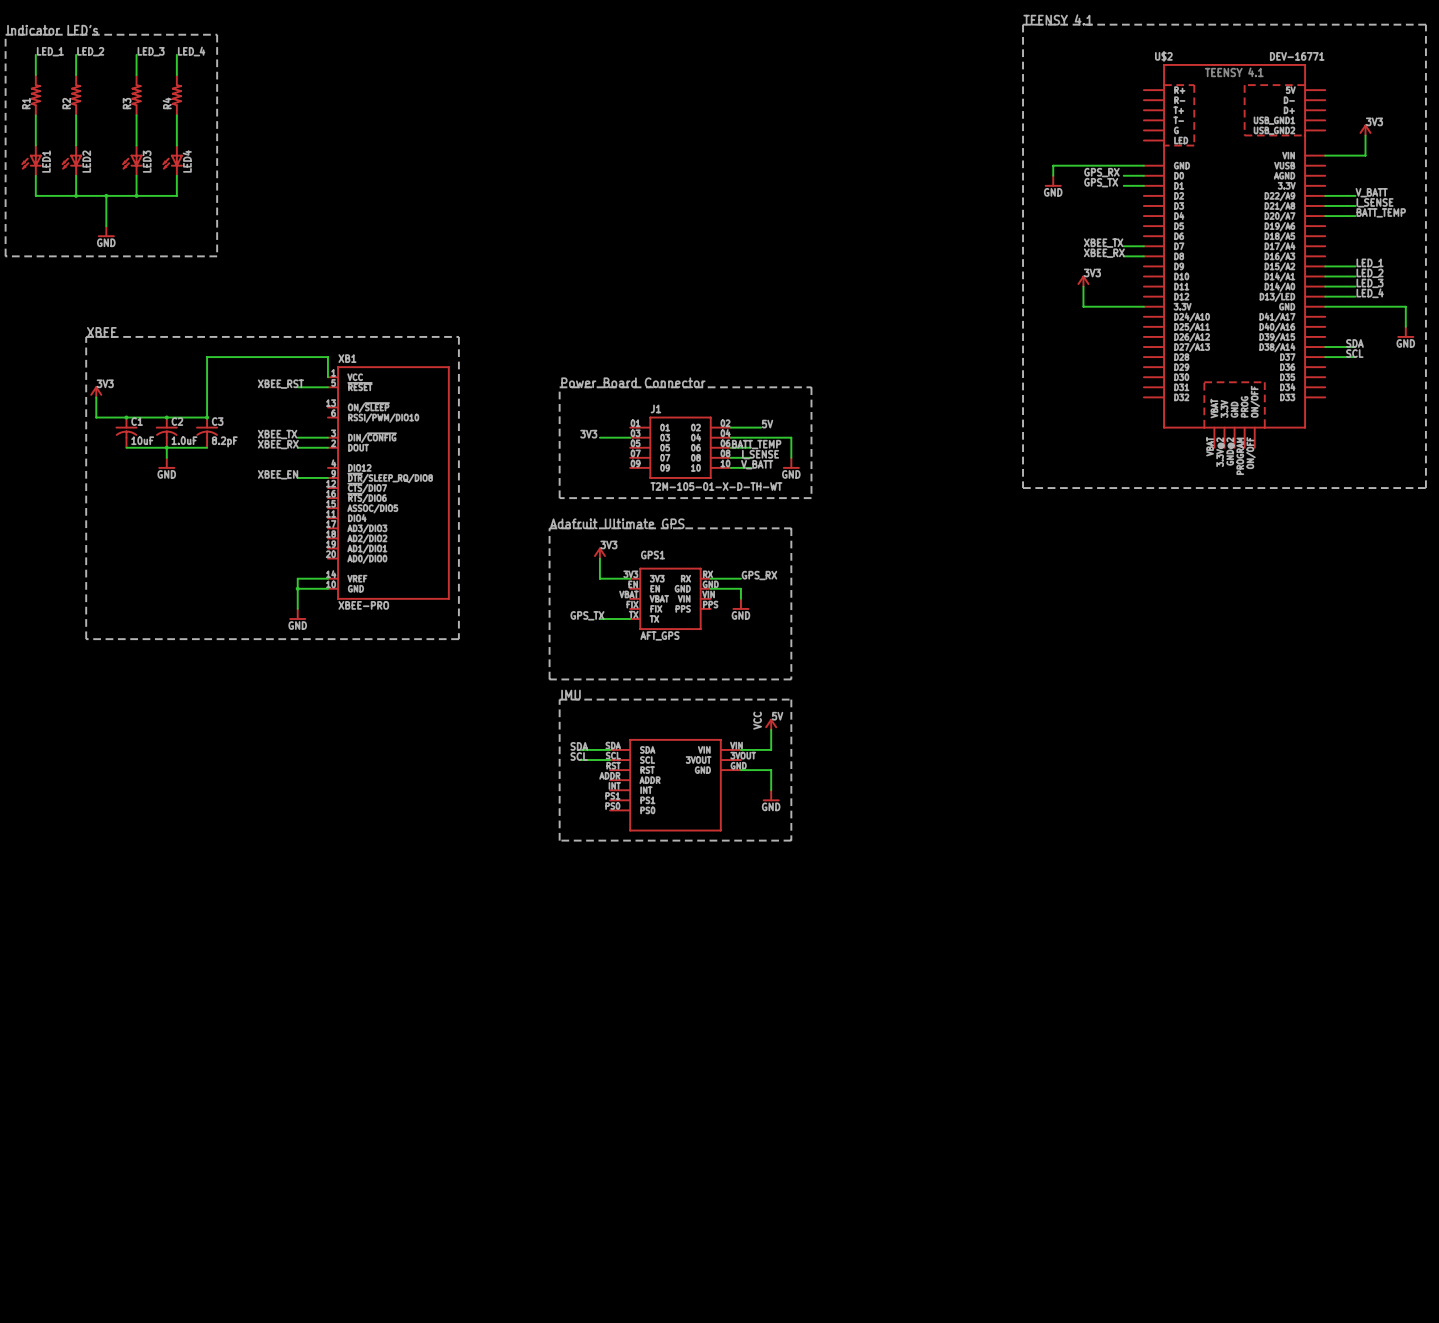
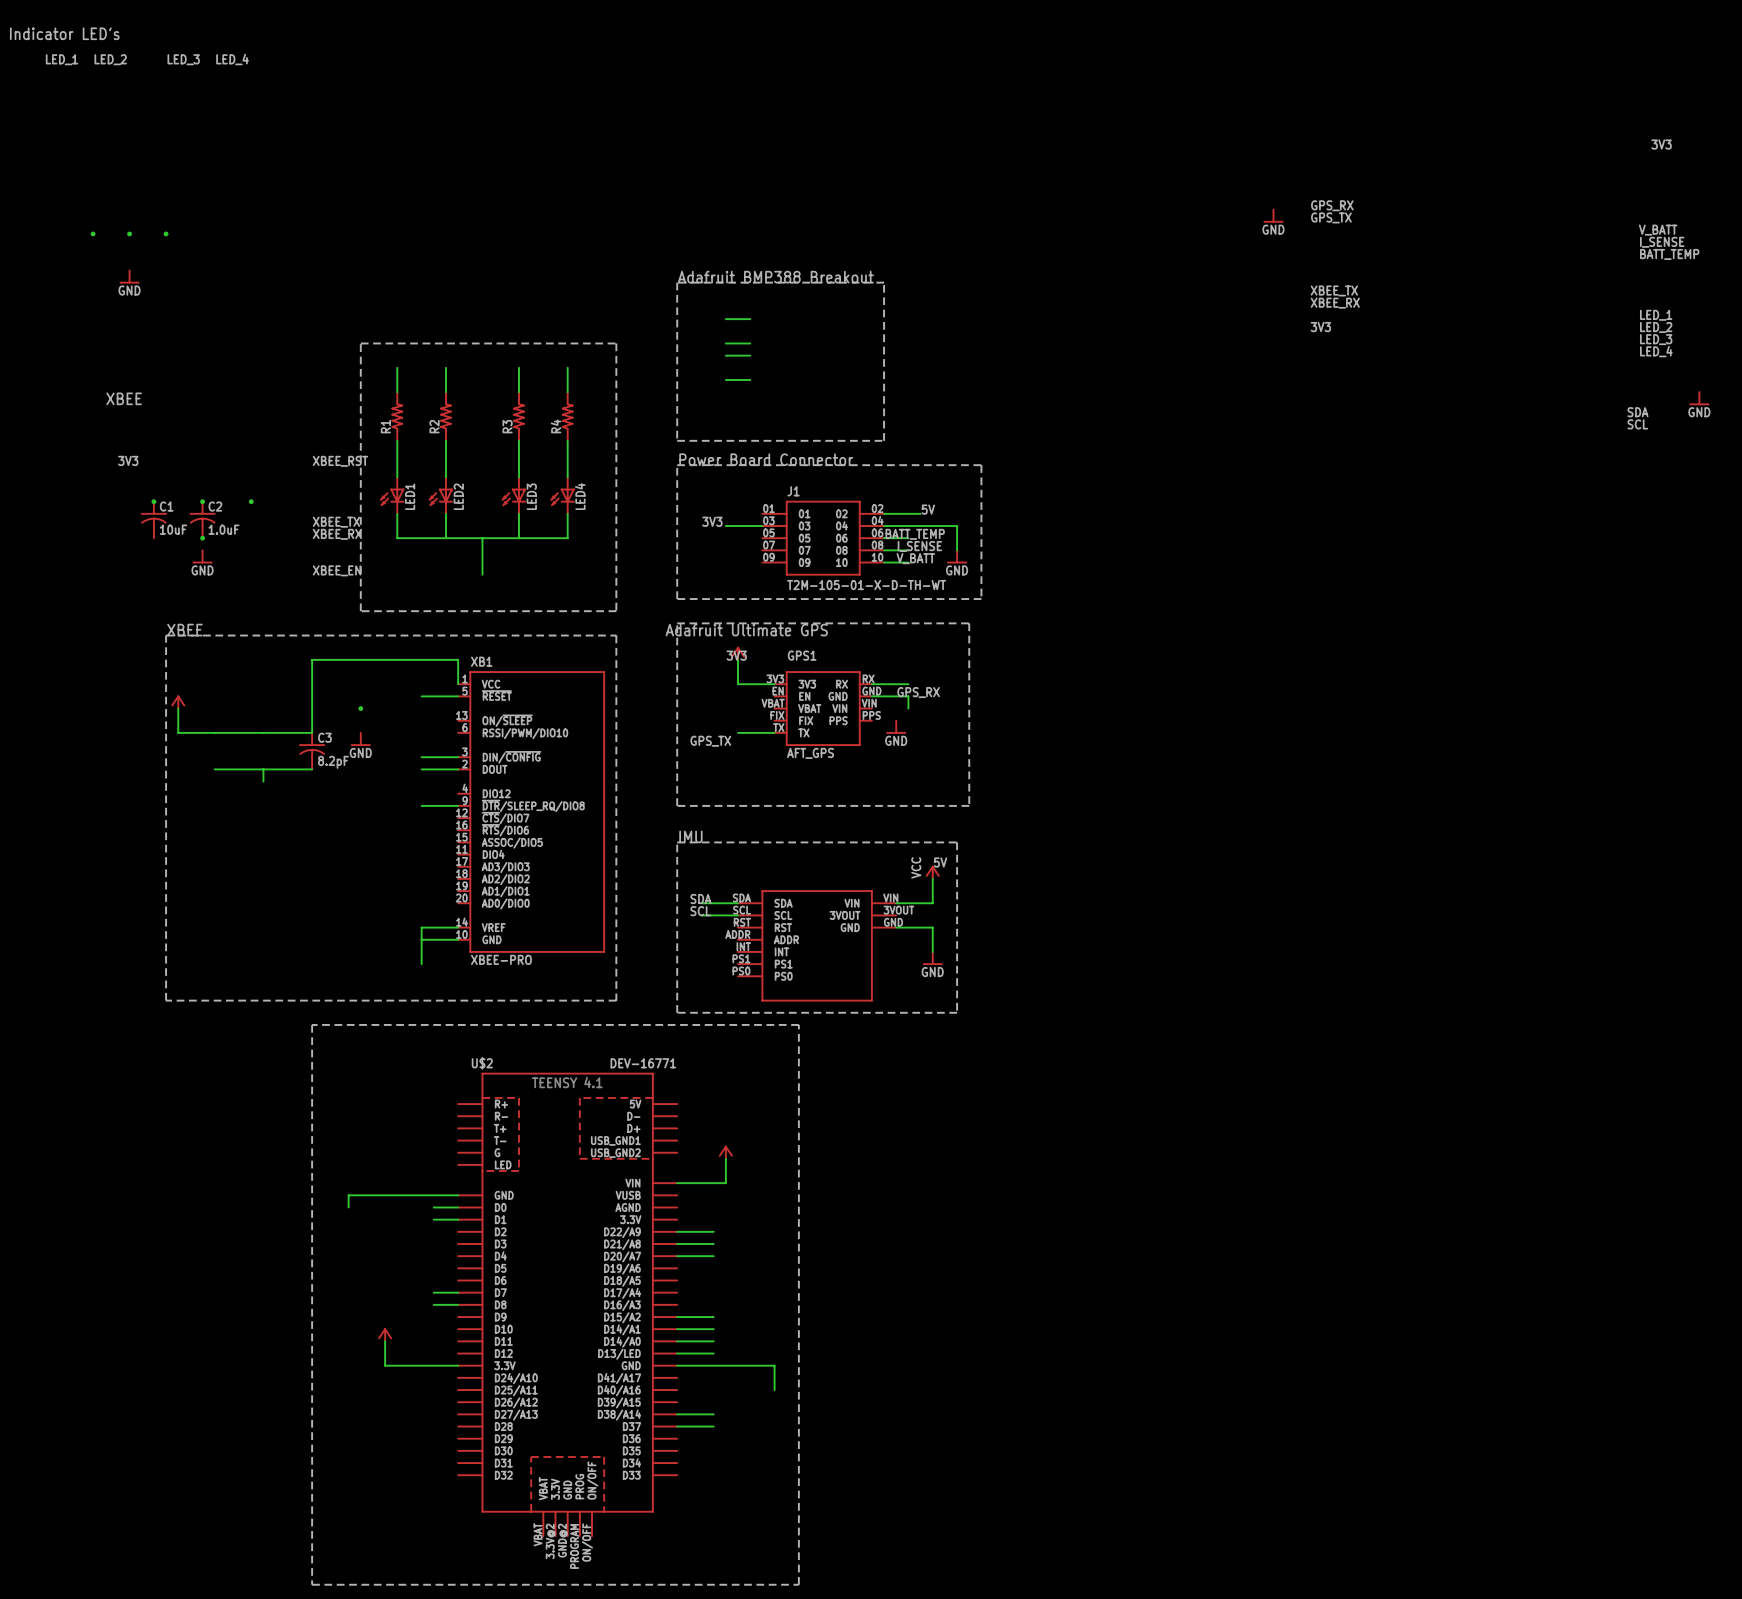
text: TEENSY 4.1 (1058, 19) -> none
line: (1023, 24) (1023, 488) (1425, 488) (1425, 24) (1023, 24) -> none
line: (5, 34) (217, 34) (217, 256) (5, 256) (5, 34) -> none
wire: (35, 54) (35, 75) -> none
wire: (76, 54) (76, 75) -> none
wire: (136, 54) (136, 75) -> none
wire: (176, 54) (176, 75) -> none
R1 position: (35, 95) -> (397, 416)
R2 position: (76, 95) -> (445, 416)
R3 position: (136, 95) -> (518, 416)
R4 position: (176, 95) -> (567, 416)
wire: (35, 115) (35, 145) -> none
wire: (76, 115) (76, 145) -> none
wire: (136, 115) (136, 145) -> none
wire: (176, 115) (176, 145) -> none
power symbol: (1365, 130) -> none
wire: (1365, 135) (1365, 155) (1325, 155) -> none
LED1 position: (31, 160) -> (392, 495)
LED2 position: (71, 160) -> (440, 495)
LED3 position: (132, 160) -> (513, 495)
LED4 position: (172, 160) -> (562, 495)
wire: (1143, 165) (1053, 165) (1053, 175) -> none
wire: (35, 175) (35, 195) (176, 195) (176, 175) -> none
wire: (76, 175) (76, 195) -> none
wire: (136, 175) (136, 195) -> none
wire: (1123, 175) (1143, 175) -> none
wire: (1123, 185) (1143, 185) -> none
wire: (106, 195) (106, 226) -> none
wire: (1325, 195) (1355, 195) -> none
wire: (1325, 205) (1355, 205) -> none
wire: (1325, 216) (1355, 216) -> none
text: none -> Adafruit BMP388 Breakout (775, 277)
line: none -> (677, 282) (677, 440) (884, 440) (884, 282) (677, 282)
wire: (1123, 246) (1143, 246) -> none
wire: (1123, 256) (1143, 256) -> none
U$2 position: (1234, 256) -> (567, 1304)
wire: none -> (725, 319) (750, 319)
wire: (1325, 266) (1355, 266) -> none
wire: (1325, 276) (1355, 276) -> none
power symbol: (1083, 281) -> none
line: none -> (360, 343) (616, 343) (616, 611) (360, 611) (360, 343)
wire: none -> (725, 343) (750, 343)
wire: (1083, 286) (1083, 306) (1143, 306) -> none
wire: (1325, 286) (1355, 286) -> none
wire: none -> (725, 355) (750, 355)
wire: (1325, 296) (1355, 296) -> none
wire: none -> (397, 367) (397, 392)
wire: none -> (445, 367) (445, 392)
wire: none -> (518, 367) (518, 392)
wire: none -> (567, 367) (567, 392)
wire: (1325, 306) (1405, 306) (1405, 326) -> none
wire: none -> (725, 379) (750, 379)
line: (86, 336) (458, 336) (458, 639) (86, 639) (86, 336) -> none
wire: (1325, 347) (1355, 347) -> none
wire: (1325, 357) (1355, 357) -> none
wire: (327, 367) (327, 357) (207, 357) (207, 417) (96, 417) (96, 397) -> none
wire: none -> (445, 440) (445, 477)
wire: none -> (518, 440) (518, 477)
wire: none -> (567, 440) (567, 477)
wire: none -> (397, 453) (397, 477)
wire: (297, 387) (327, 387) -> none
power symbol: (96, 392) -> none
wire: none -> (397, 513) (397, 538) (567, 538) (567, 513)
wire: none -> (445, 513) (445, 538)
wire: none -> (518, 513) (518, 538)
C3 position: (207, 432) -> (312, 751)
wire: (297, 437) (327, 437) -> none
wire: (126, 447) (207, 447) -> none
wire: (166, 447) (166, 457) -> none
wire: (297, 447) (327, 447) -> none
wire: none -> (482, 538) (482, 574)
wire: (297, 477) (327, 477) -> none
XB1 position: (388, 483) -> (531, 811)
text: none -> XBEE (184, 630)
line: none -> (166, 635) (616, 635) (616, 1000) (166, 1000) (166, 635)
line: (549, 528) (791, 528) (791, 679) (549, 679) (549, 528) -> (677, 623) (969, 623) (969, 805) (677, 805) (677, 623)
power symbol position: (599, 553) -> (738, 653)
wire: (599, 558) (599, 578) (630, 578) -> (738, 659) (738, 684) (774, 684)
wire: none -> (458, 684) (458, 659) (312, 659) (312, 732) (178, 732) (178, 708)
wire: none -> (871, 684) (908, 684)
wire: (327, 578) (297, 578) (297, 608) -> none
wire: none -> (896, 696) (908, 696) (908, 708)
power symbol: none -> (178, 702)
wire: (297, 588) (327, 588) -> (421, 696) (458, 696)
wire: (710, 588) (740, 588) (740, 598) -> none
GPS1 position: (670, 598) -> (823, 708)
wire: (599, 618) (630, 618) -> (738, 732) (774, 732)
wire: none -> (421, 757) (458, 757)
wire: none -> (263, 769) (263, 781)
wire: none -> (421, 805) (458, 805)
wire: none -> (458, 927) (421, 927) (421, 964)
wire: none -> (421, 939) (458, 939)
line: none -> (312, 1024) (312, 1584) (798, 1584) (798, 1024) (312, 1024)
power symbol: none -> (725, 1152)
wire: none -> (725, 1158) (725, 1183) (677, 1183)
wire: none -> (458, 1195) (348, 1195) (348, 1207)
wire: none -> (433, 1207) (458, 1207)
wire: none -> (433, 1219) (458, 1219)
wire: none -> (677, 1231) (713, 1231)
wire: none -> (677, 1244) (713, 1244)
wire: none -> (677, 1256) (713, 1256)
wire: none -> (433, 1292) (458, 1292)
wire: none -> (433, 1304) (458, 1304)
wire: none -> (677, 1317) (713, 1317)
wire: none -> (677, 1329) (713, 1329)
power symbol: none -> (385, 1334)
wire: none -> (385, 1341) (385, 1365) (458, 1365)
wire: none -> (677, 1341) (713, 1341)
wire: none -> (677, 1353) (713, 1353)
wire: none -> (677, 1365) (774, 1365) (774, 1390)
wire: none -> (677, 1414) (713, 1414)
wire: none -> (677, 1426) (713, 1426)

